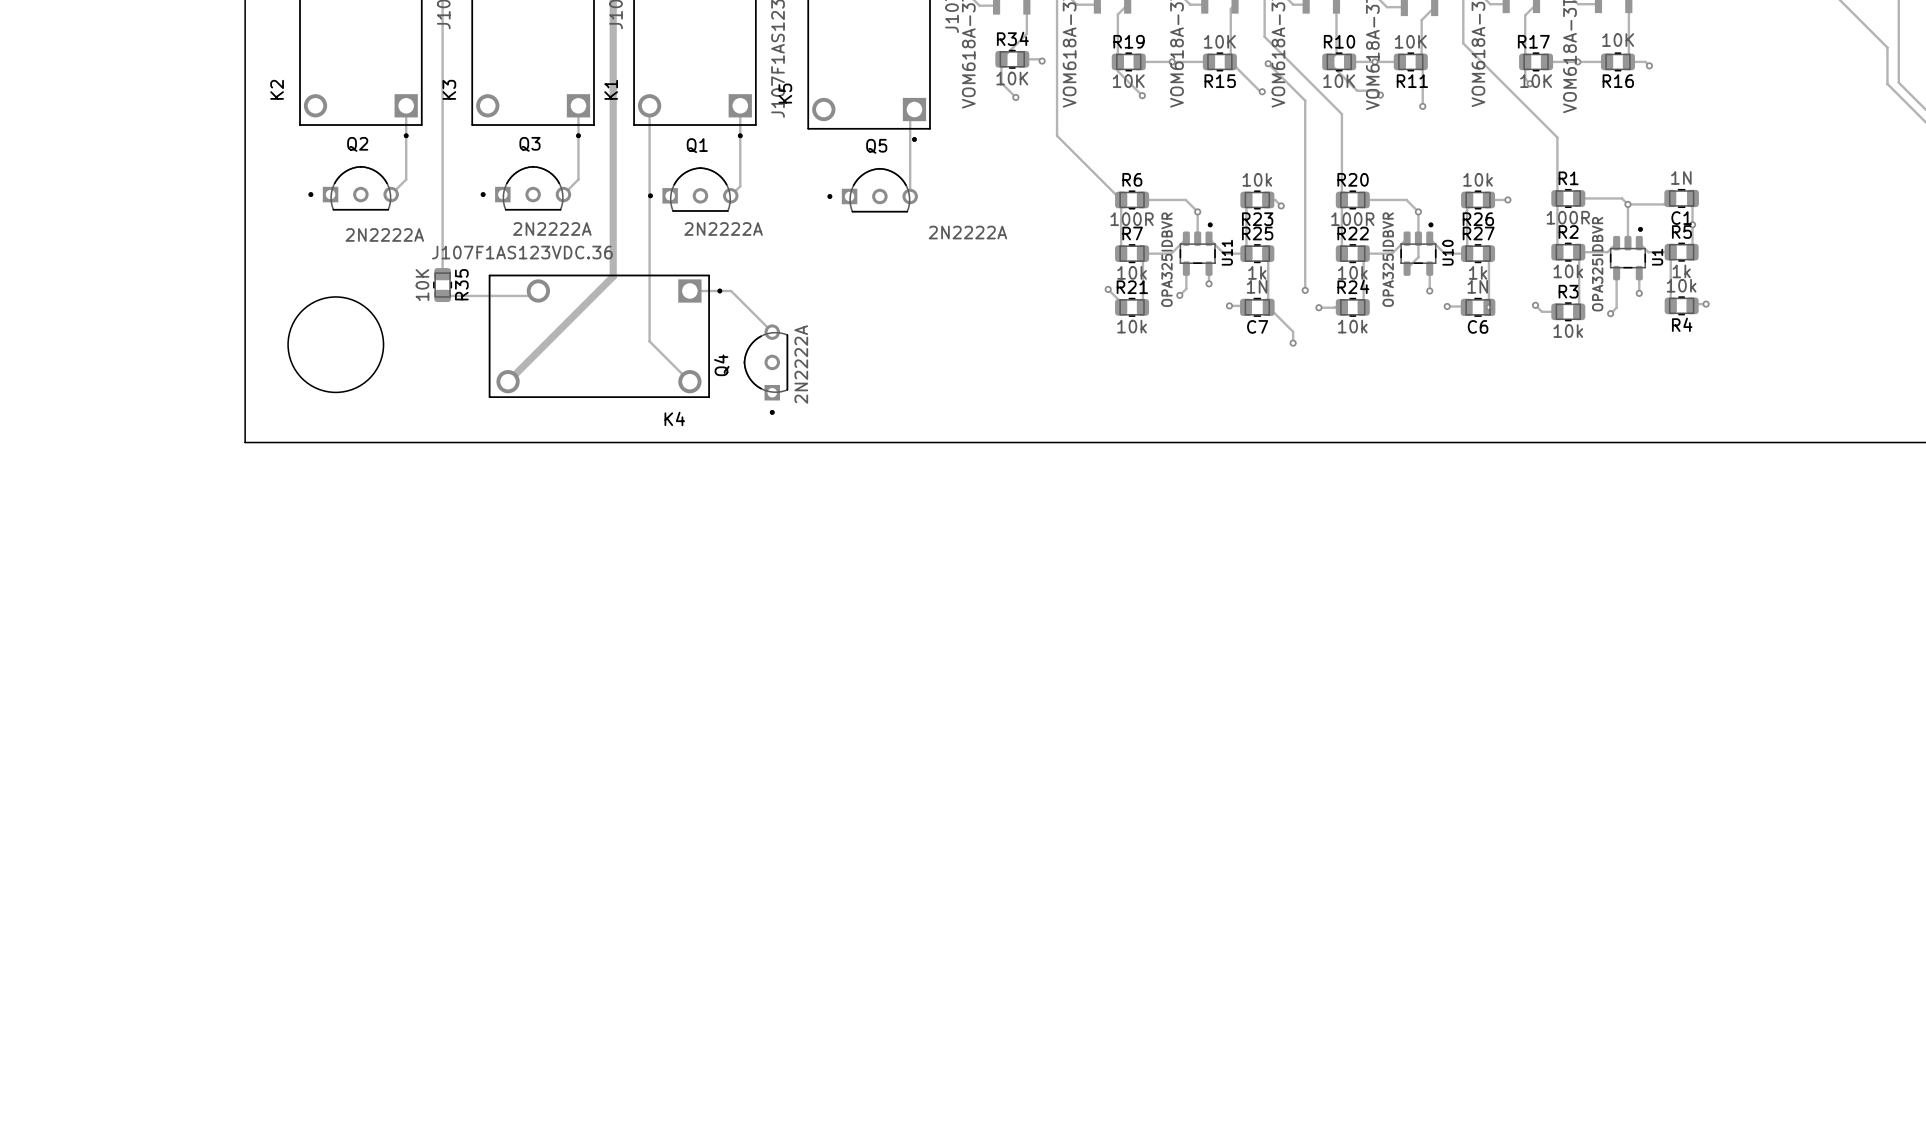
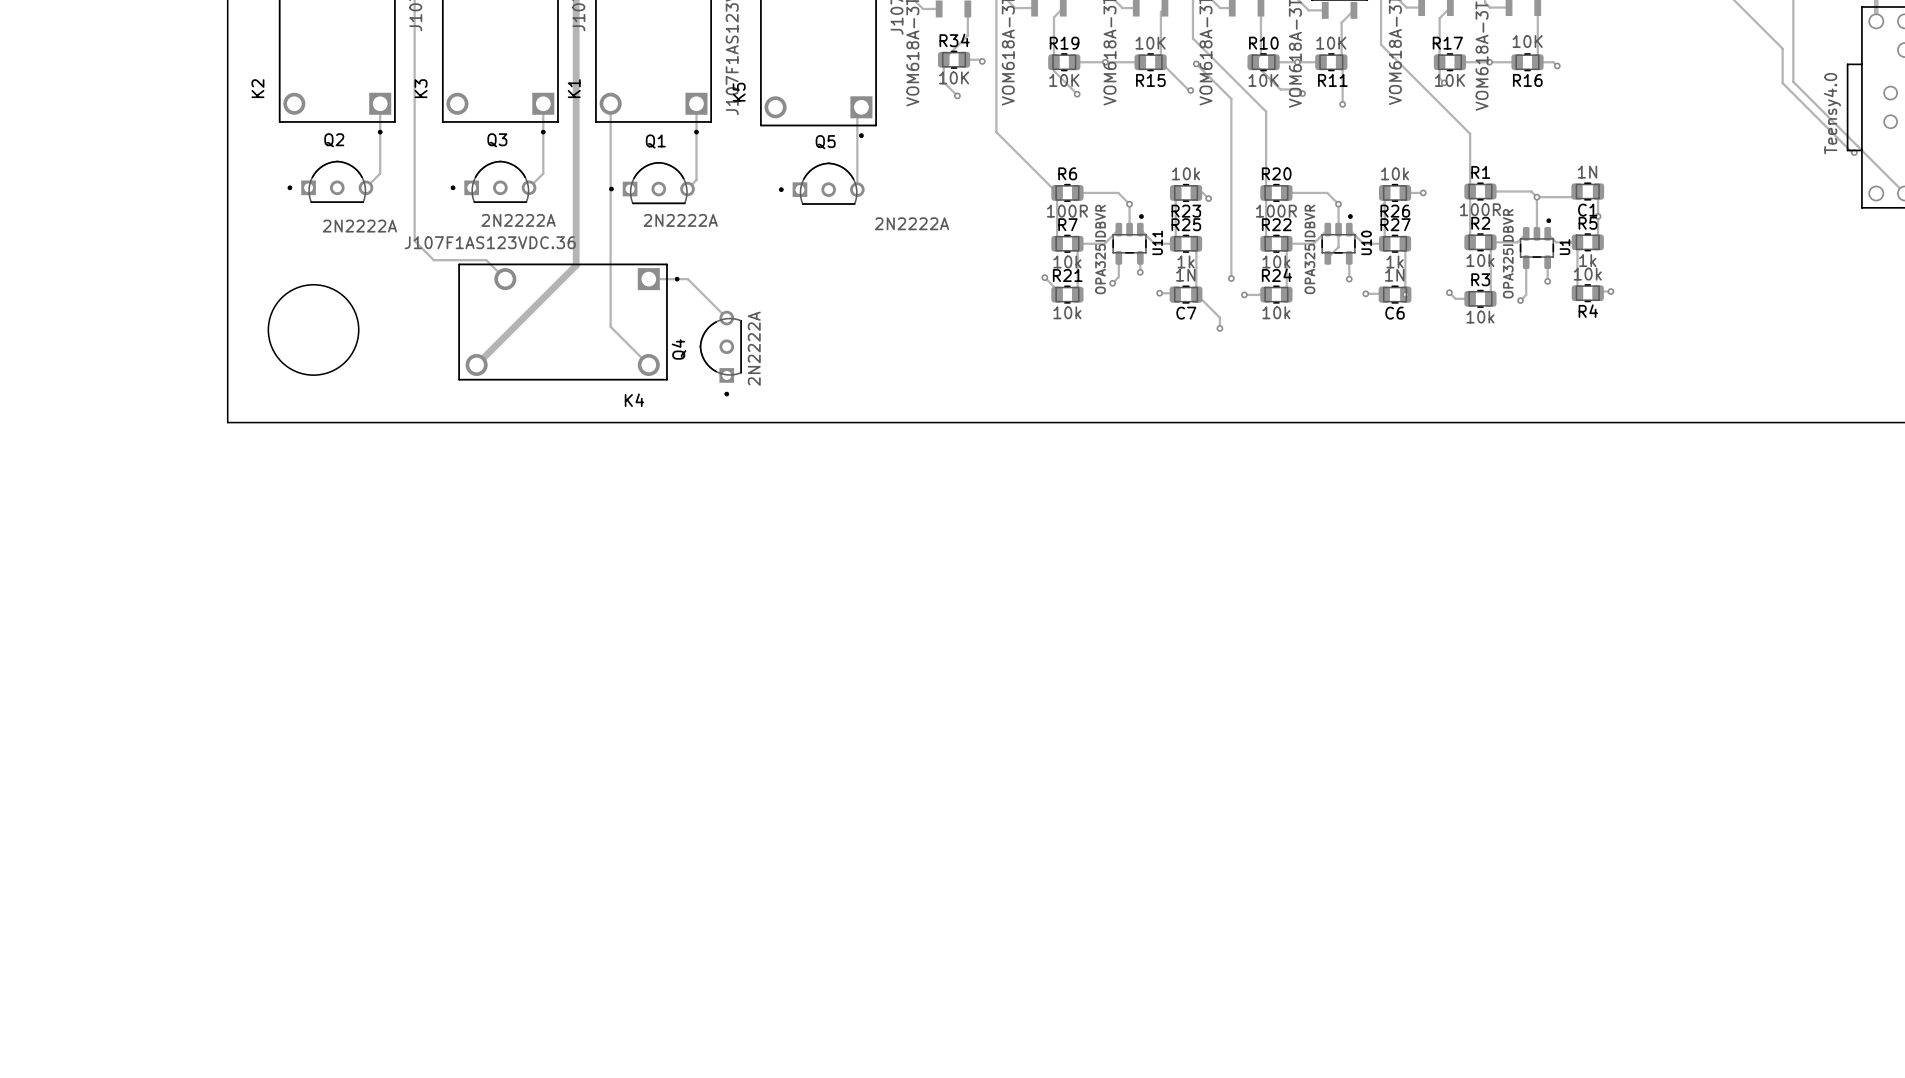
track: (442, 250) (442, 274) -> (414, 240) (433, 260) (486, 260) (505, 279)
R35: 10K (442, 285) -> none
track: (442, 295) (533, 295) -> none

